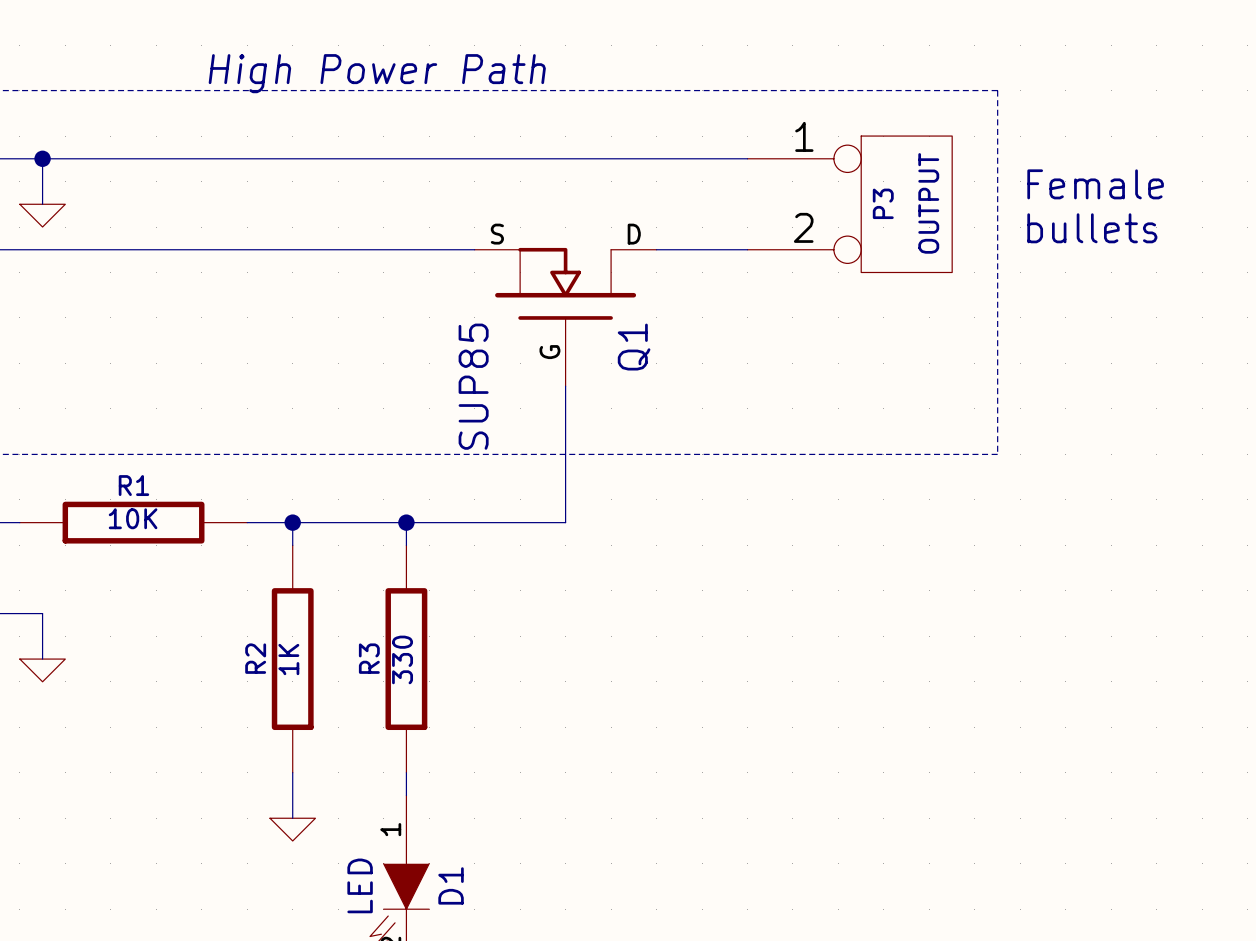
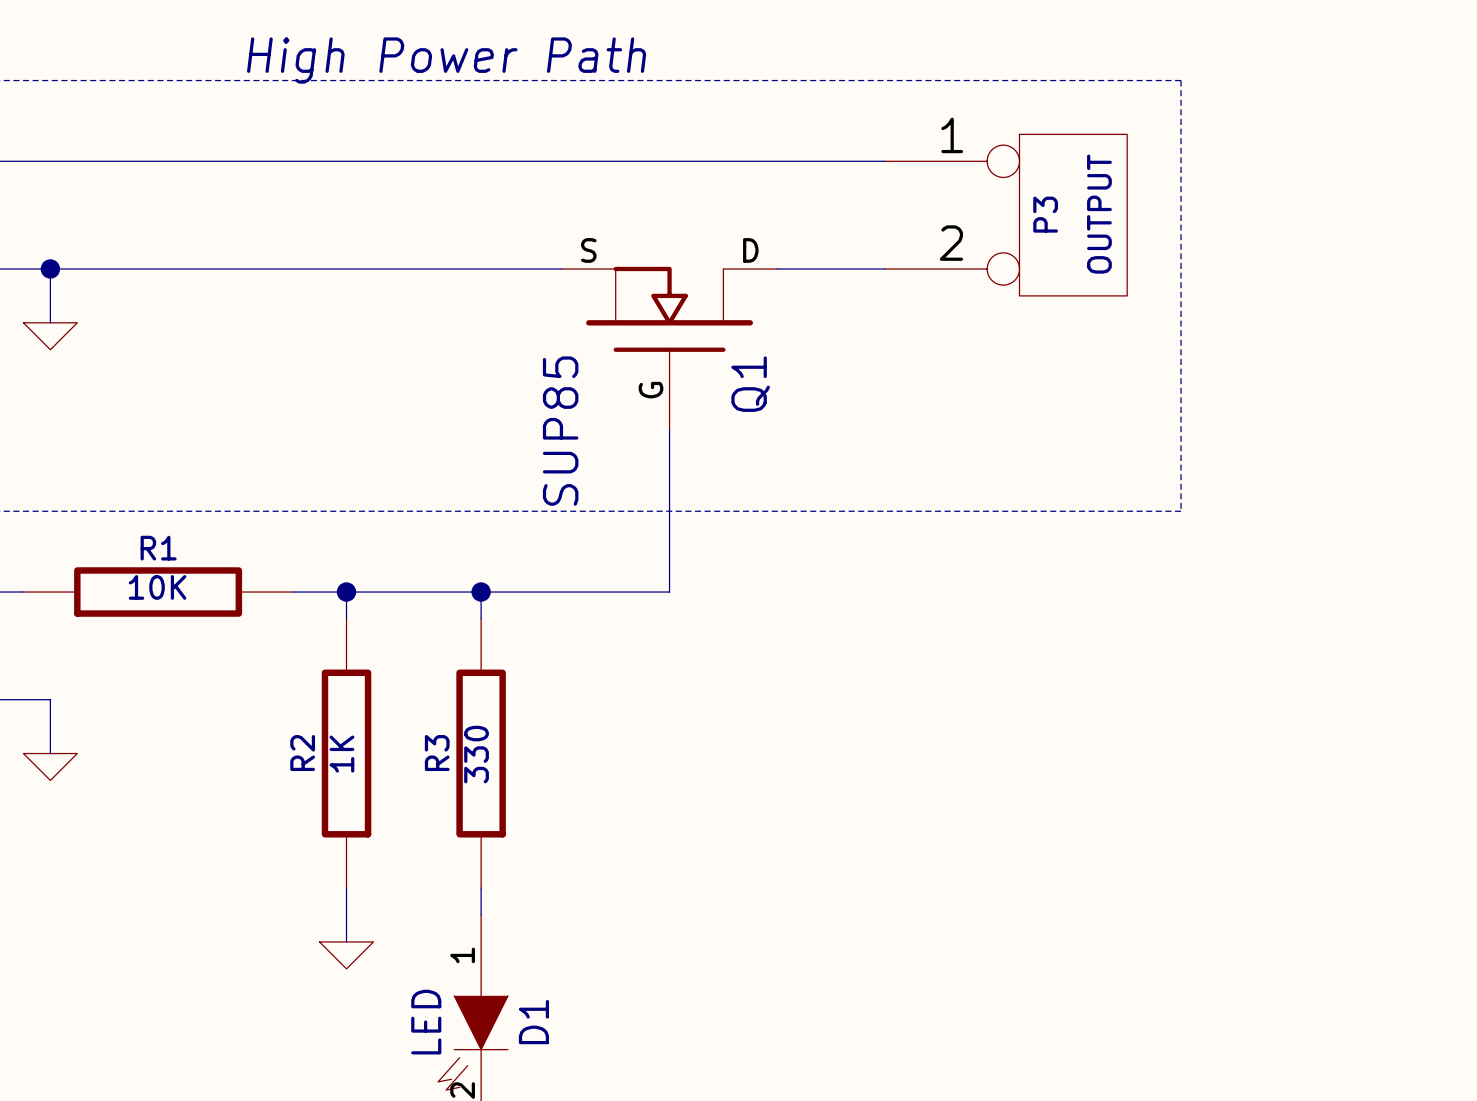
wire: (42, 158) (42, 204) -> (50, 268) (50, 322)
junction position: (42, 158) -> (50, 268)
text: Female (1095, 184) -> none
power symbol position: (42, 215) -> (50, 336)
text: bullets (1092, 228) -> none

